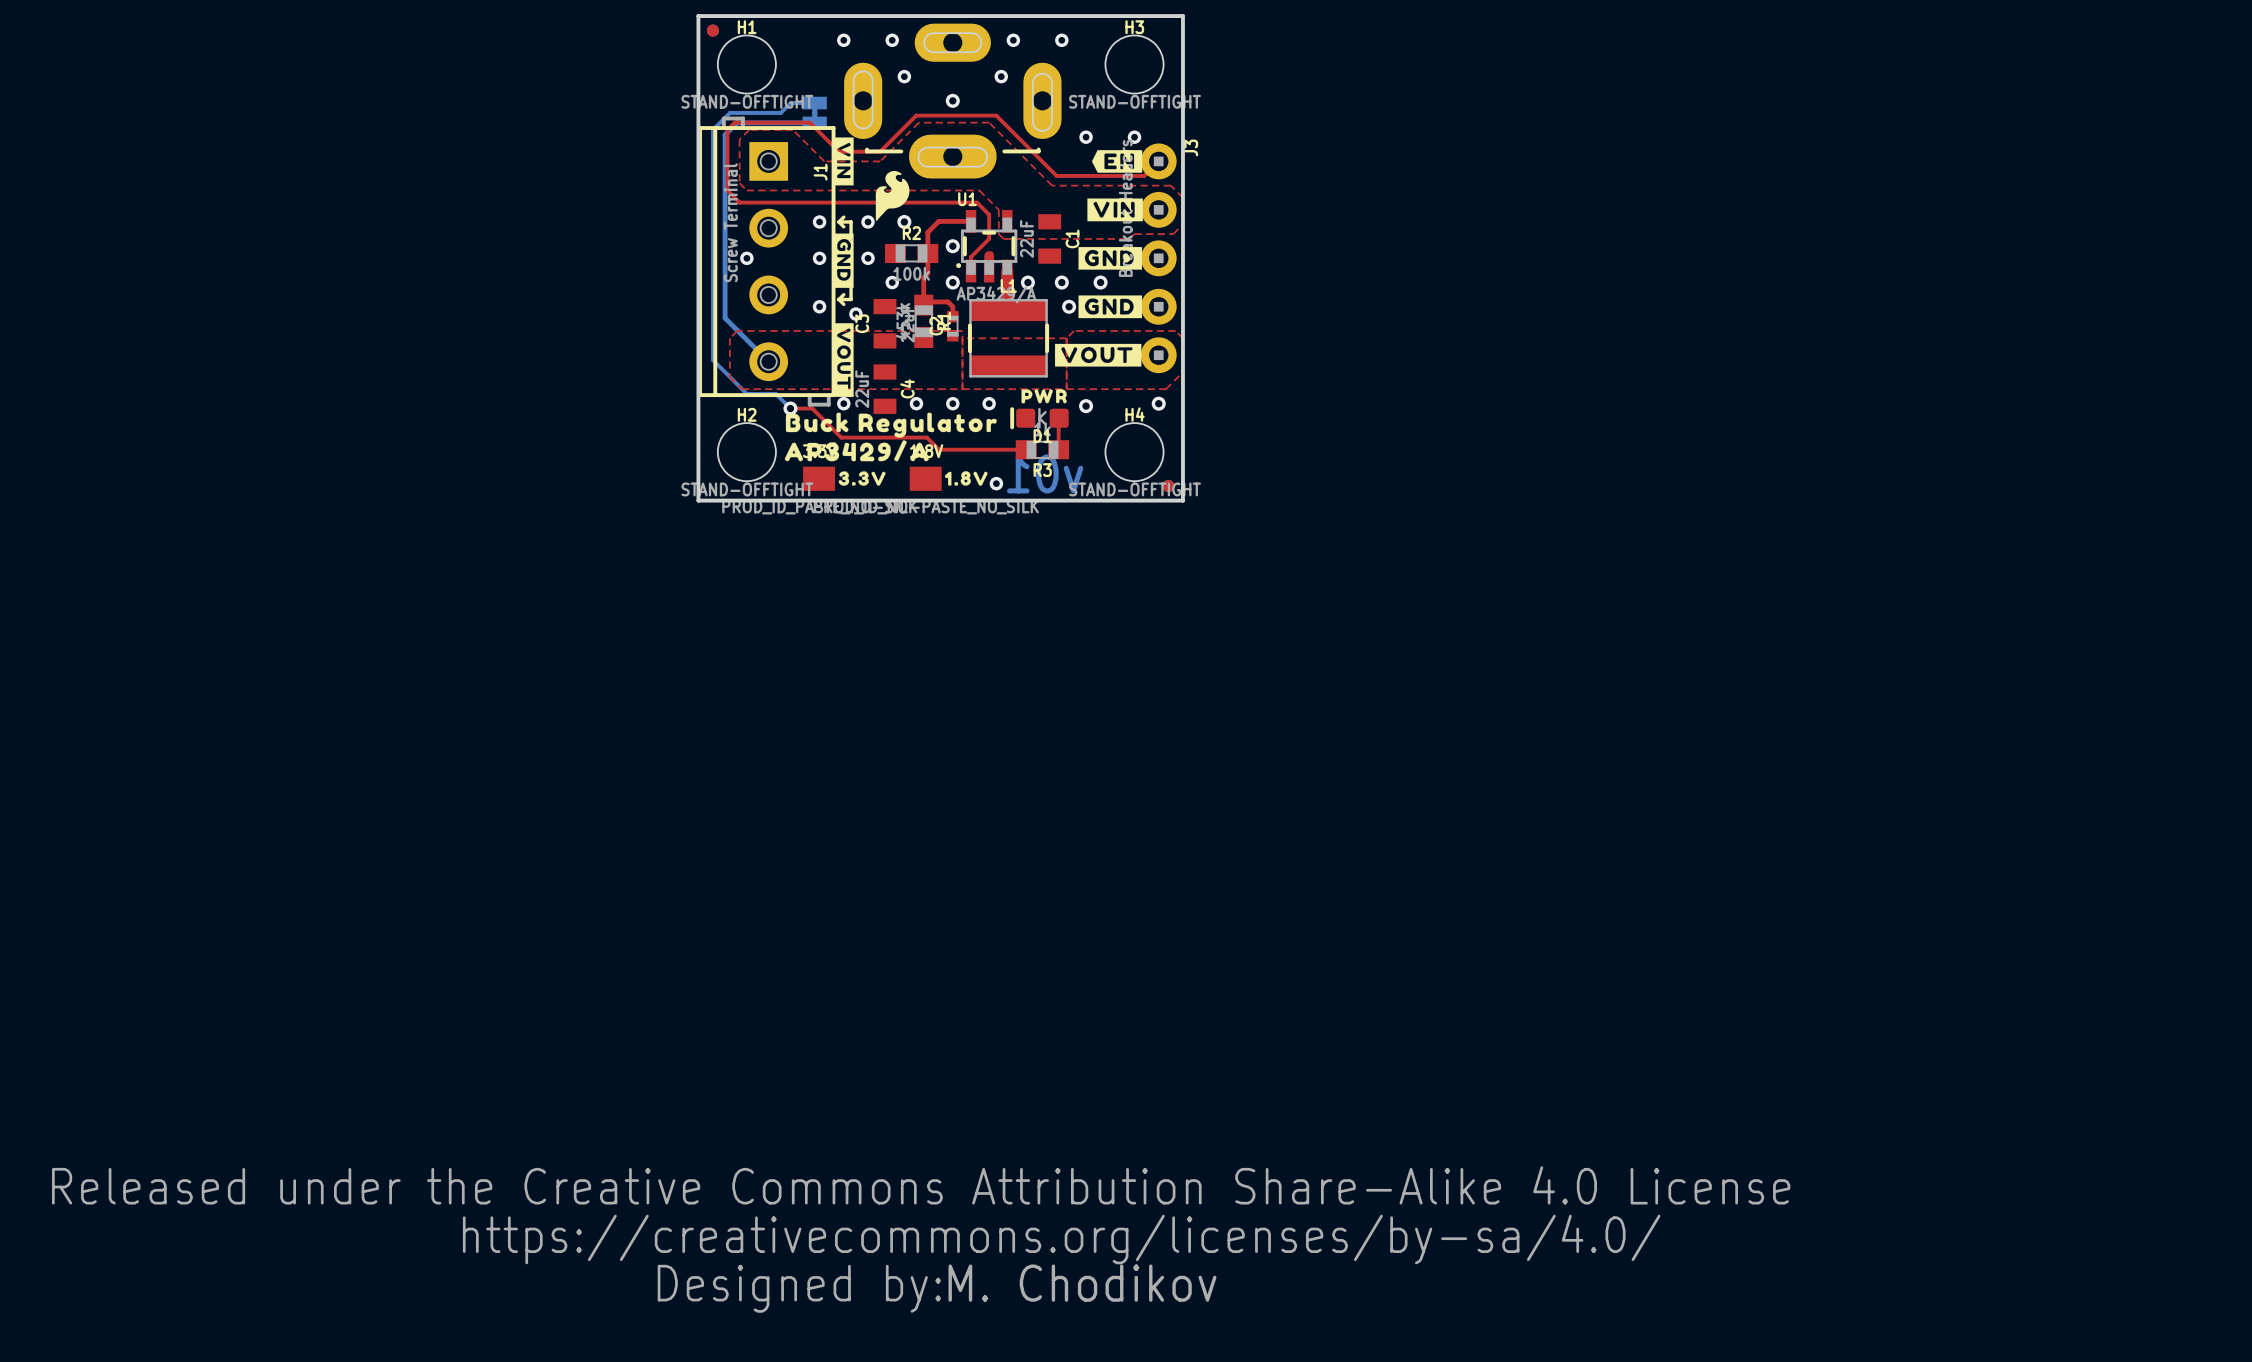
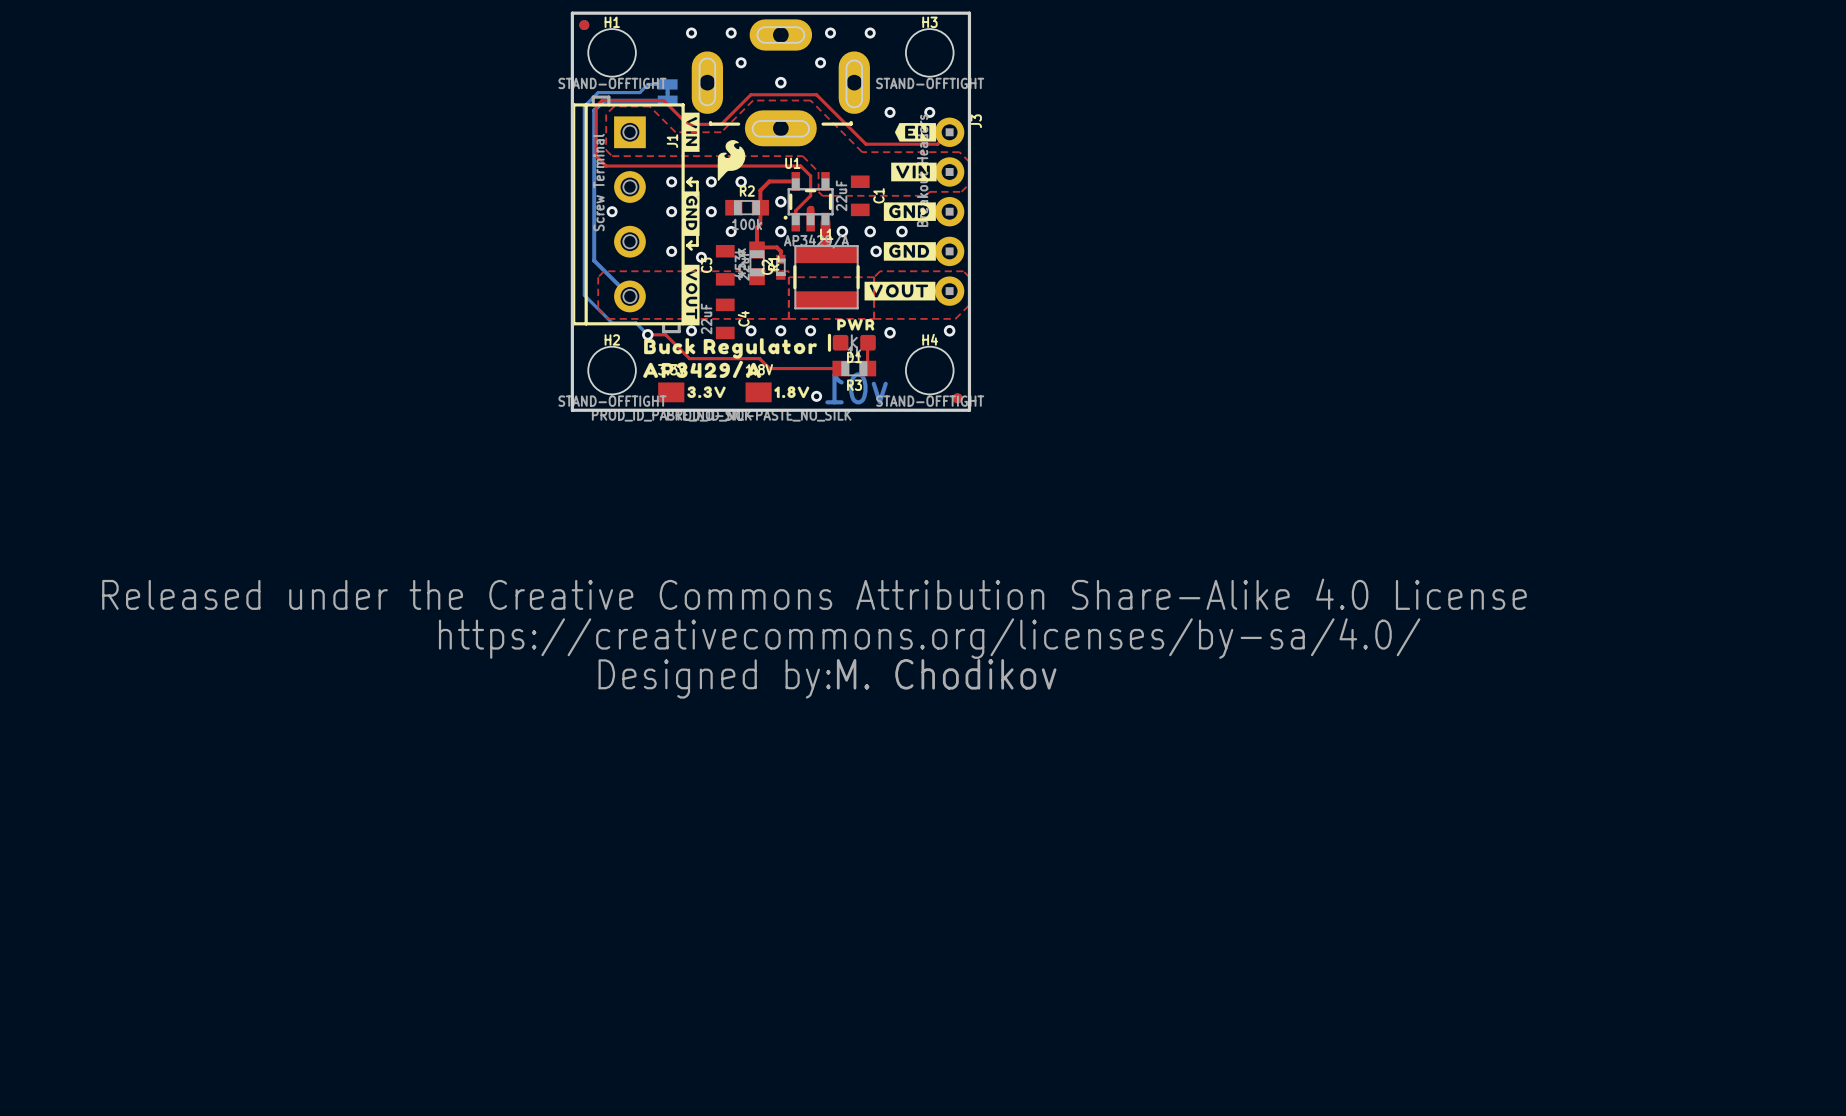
drawing position: (921, 1239) -> (814, 638)
text position: M. Chodikov (1082, 1283) -> M. Chodikov (946, 674)

